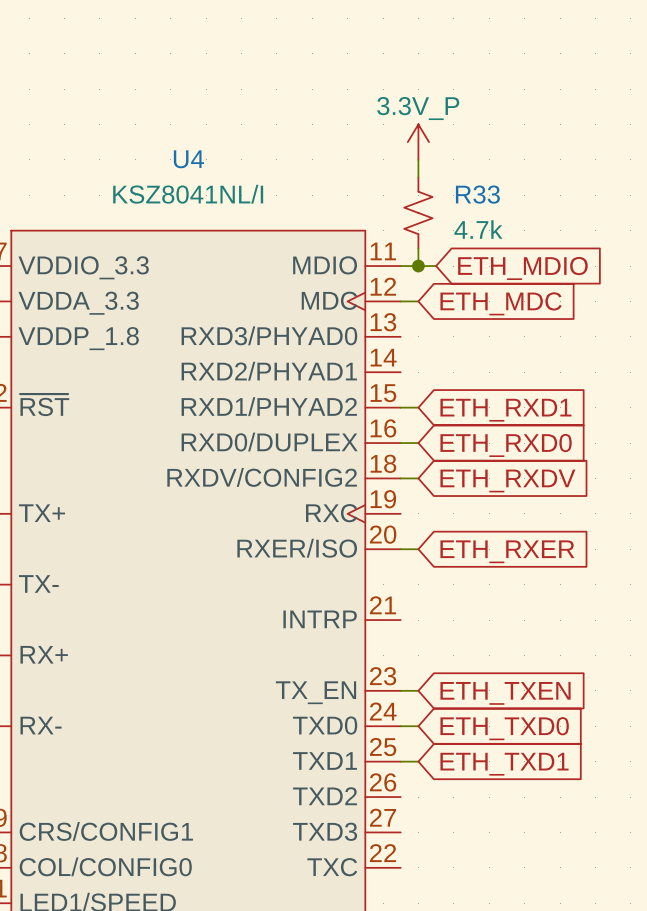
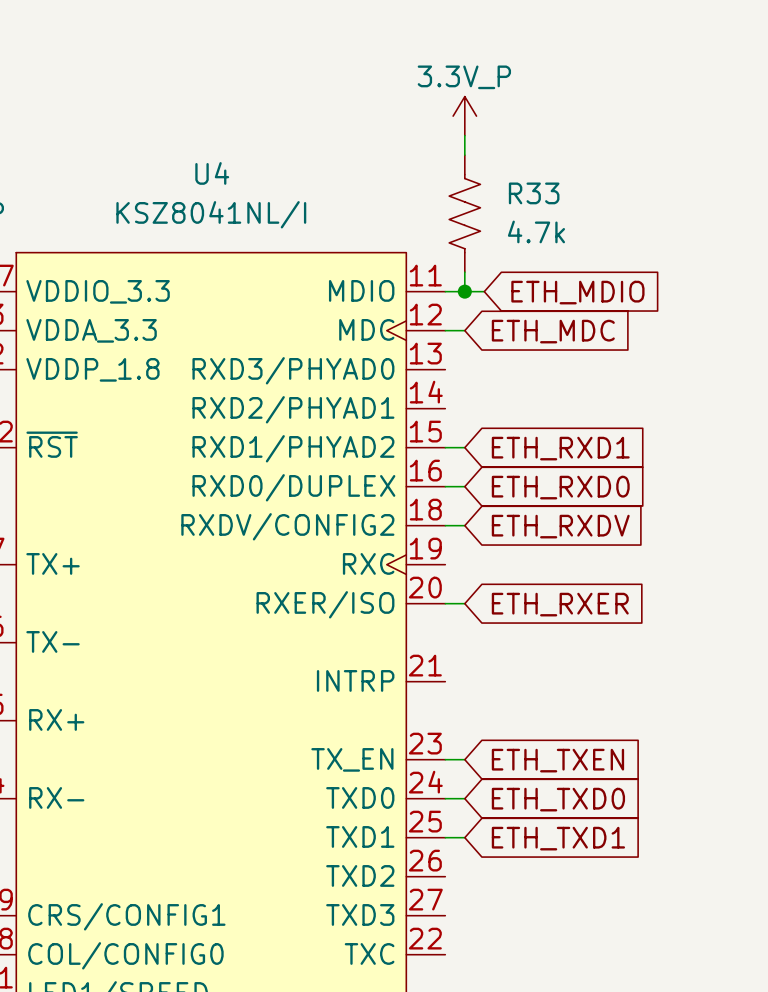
power symbol position: 3.3V_P (418, 142) -> 3.3V_P (464, 116)
R33 symbol: [404, 177, 433, 249] -> [449, 155, 481, 273]

